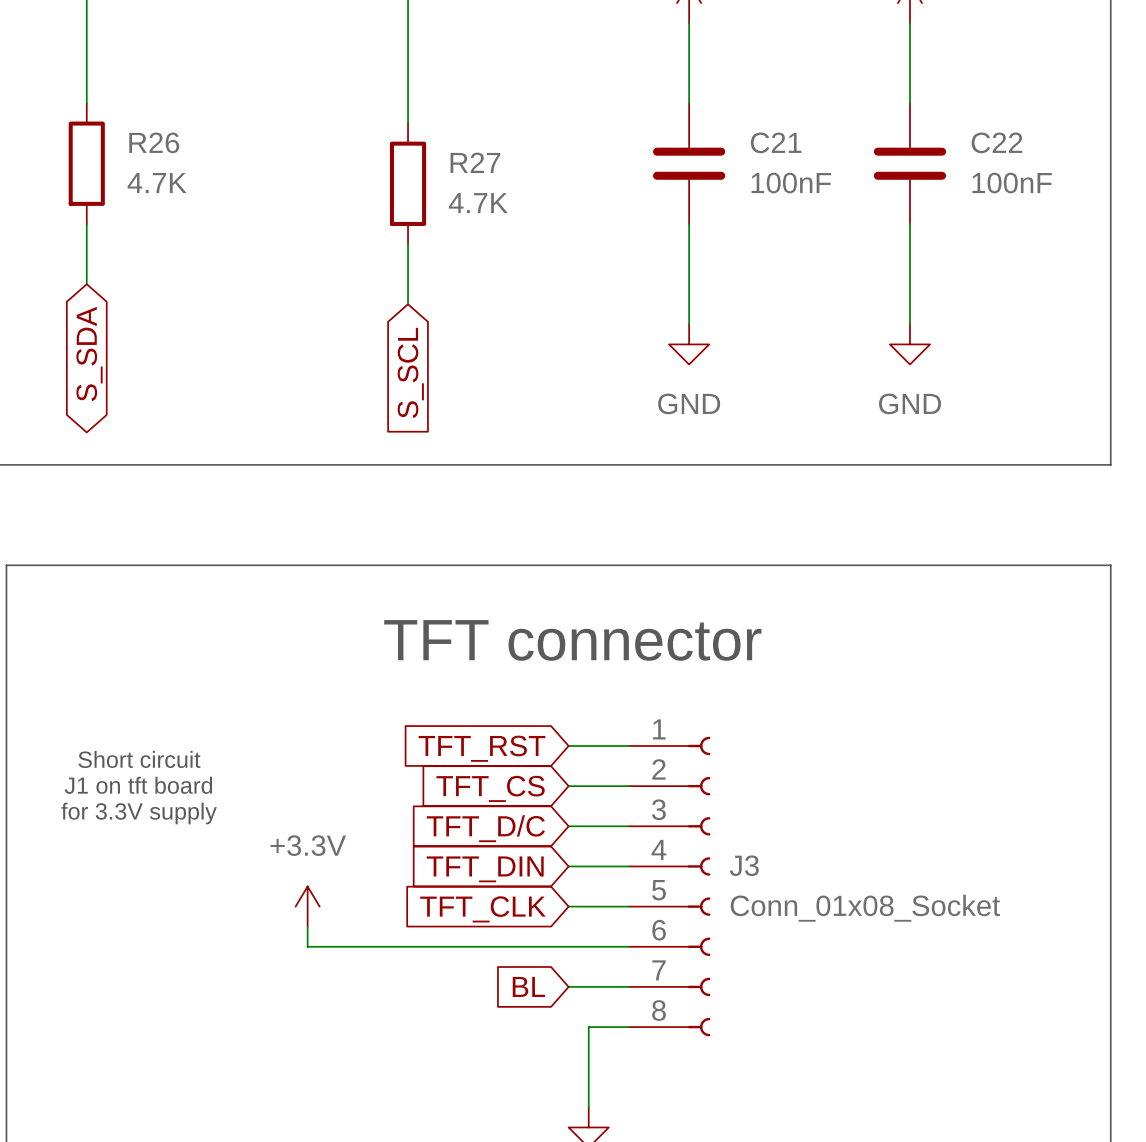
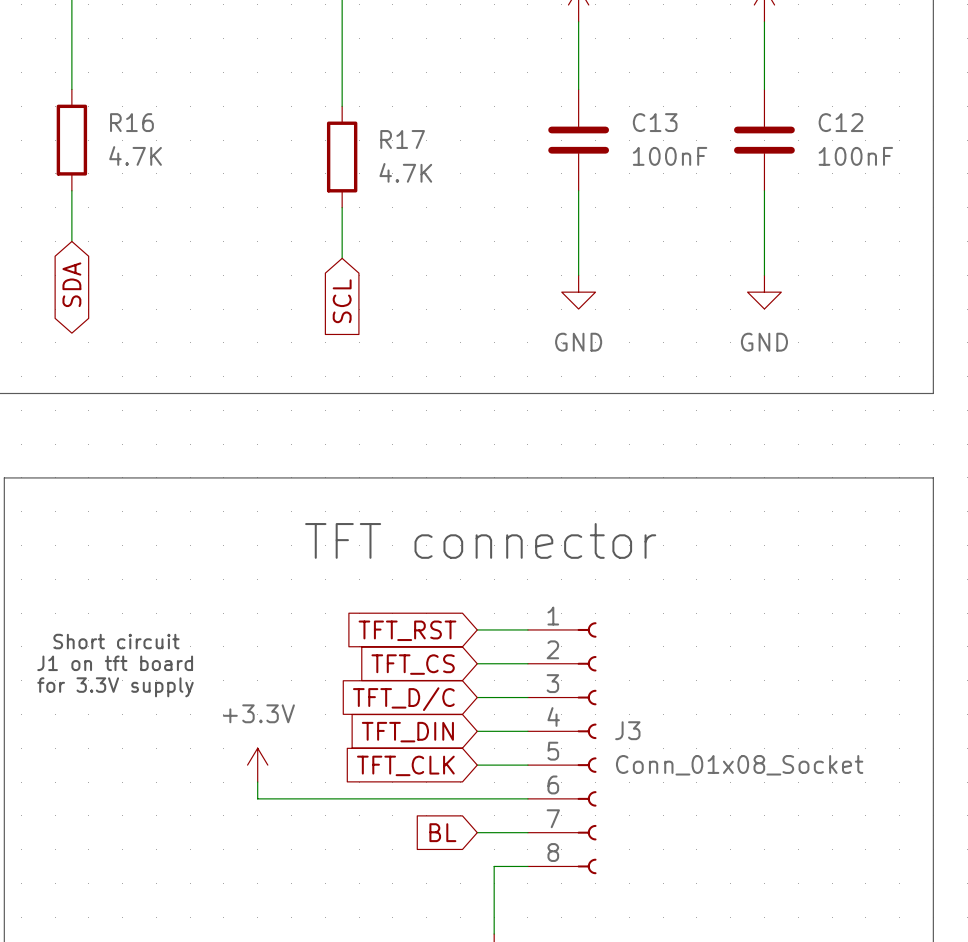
R26 name: R26 (154, 142) -> R16 (131, 122)
C21 name: C21 (776, 142) -> C13 (655, 122)
C22 name: C22 (996, 142) -> C12 (840, 122)
R27 name: R27 (475, 162) -> R17 (402, 139)
global label: S_SDA (89, 354) -> SDA (71, 284)
global label: S_SCL (410, 372) -> SCL (342, 301)

